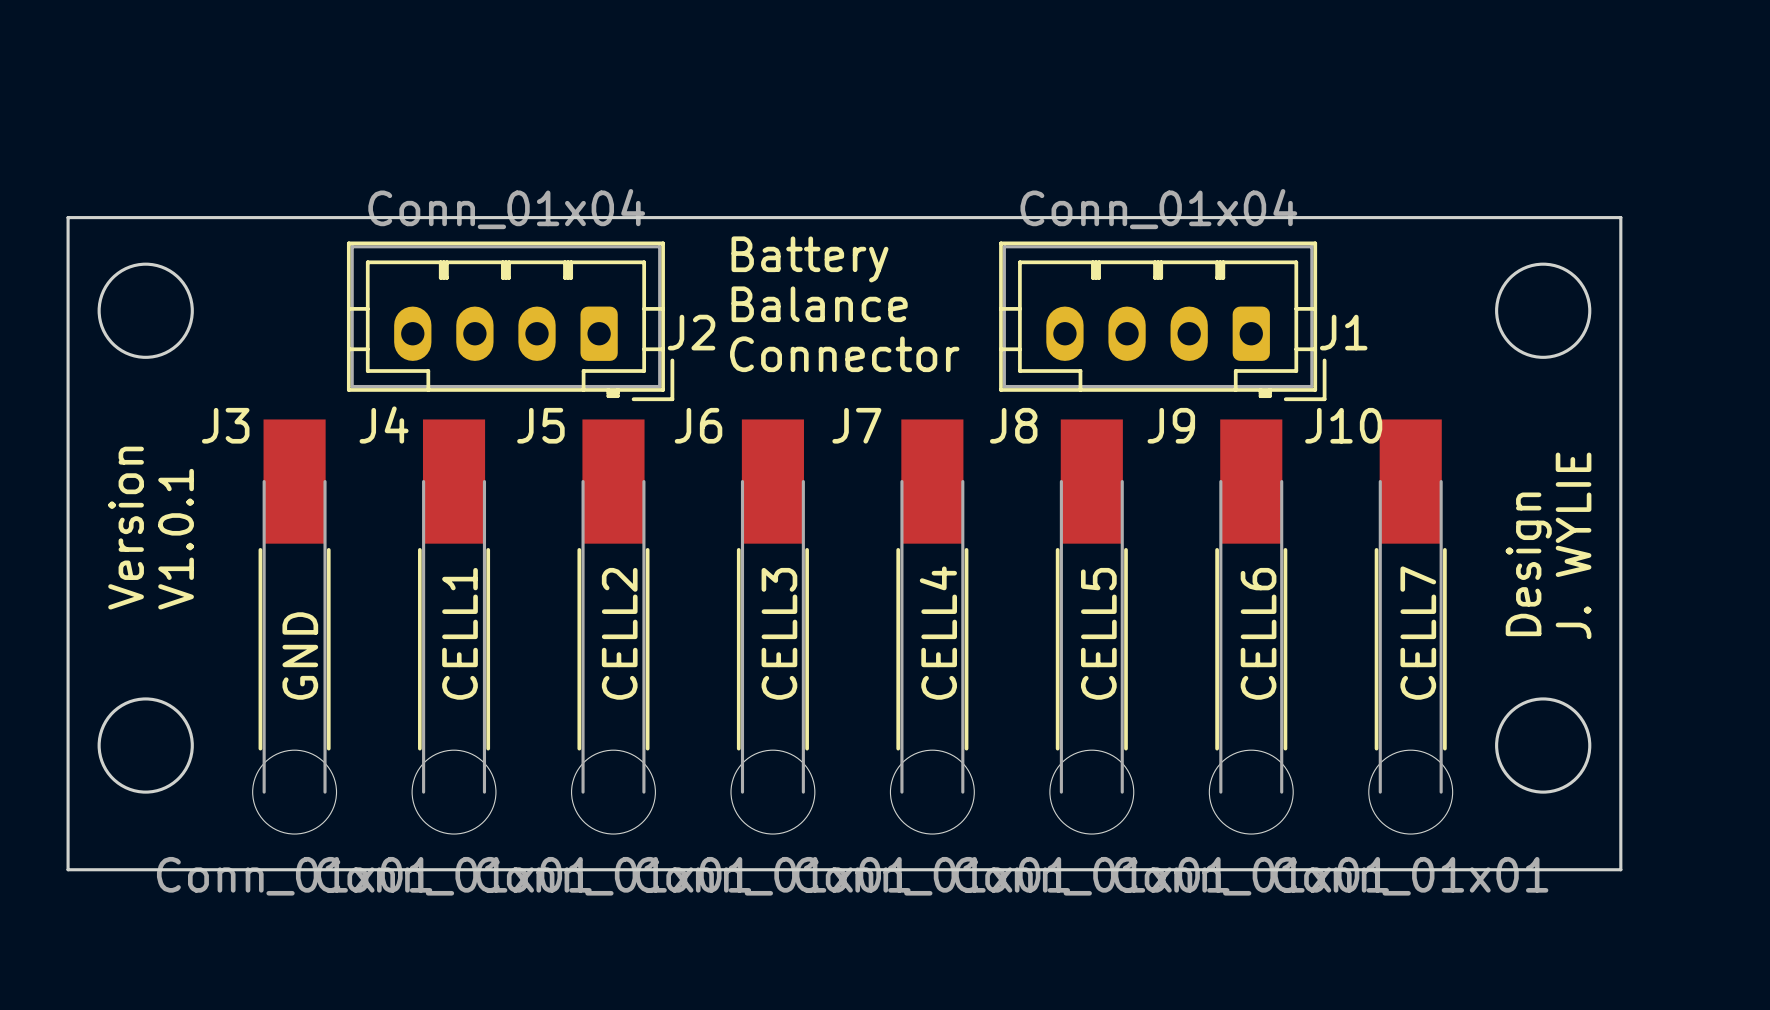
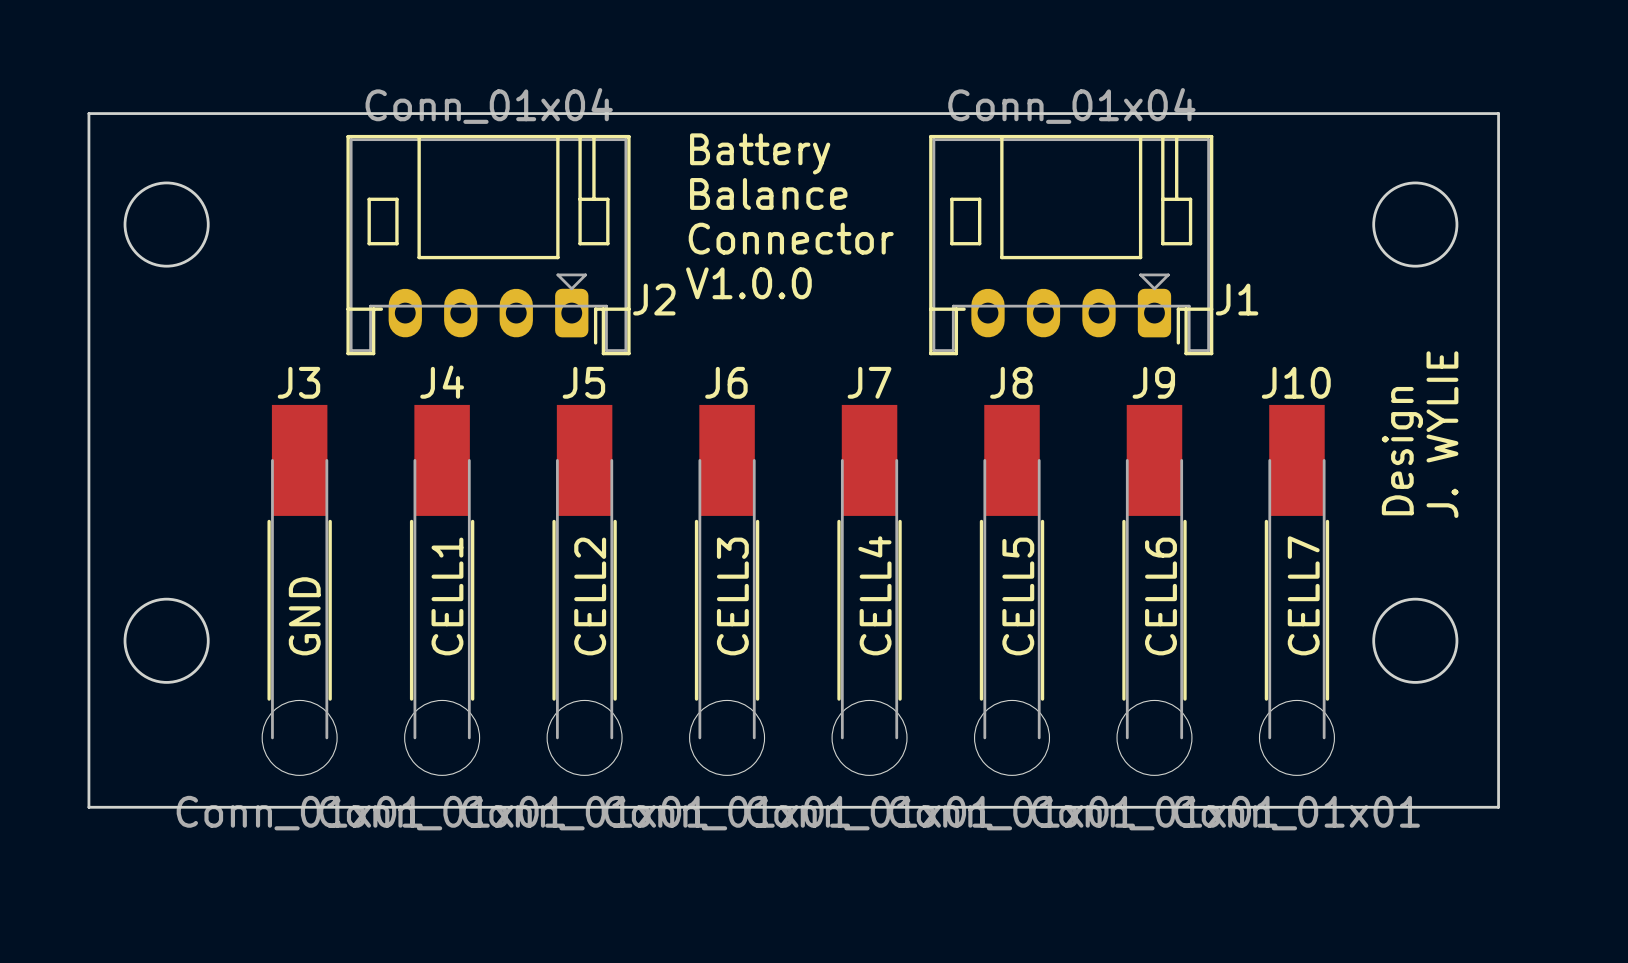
J2 footprint: [346, 241, 675, 402] -> [346, 134, 631, 356]
J1 footprint: [999, 241, 1327, 402] -> [929, 134, 1214, 356]
text position: Battery (810, 259) -> Battery (760, 153)
text: none -> V1.0.0 (748, 283)
text position: Balance (819, 304) -> Balance (768, 193)
round board edge position: (145, 310) -> (166, 224)
round board edge position: (1543, 310) -> (1415, 224)
text position: Connector (844, 354) -> Connector (791, 238)
J3 name position: J3 (225, 425) -> J3 (298, 382)
J4 name position: J4 (384, 425) -> J4 (442, 382)
J5 name position: J5 (540, 425) -> J5 (583, 382)
J6 name position: J6 (698, 425) -> J6 (726, 382)
J7 name position: J7 (856, 425) -> J7 (869, 382)
J8 name position: J8 (1013, 425) -> J8 (1011, 382)
J9 name position: J9 (1171, 425) -> J9 (1153, 382)
J10 name position: J10 (1343, 425) -> J10 (1296, 382)
text: Version (126, 528) -> none
text: V1.0.1 (176, 539) -> none
text position: J. WYLIE (1573, 545) -> J. WYLIE (1442, 434)
text position: Design (1528, 564) -> Design (1402, 451)
round board edge position: (145, 745) -> (166, 640)
round board edge position: (1543, 745) -> (1415, 640)
board edge: (68, 869) (68, 217) (1620, 217) (1620, 869) -> (97, 807) (88, 807) (88, 113) (1498, 113) (1498, 807) (1484, 807)

